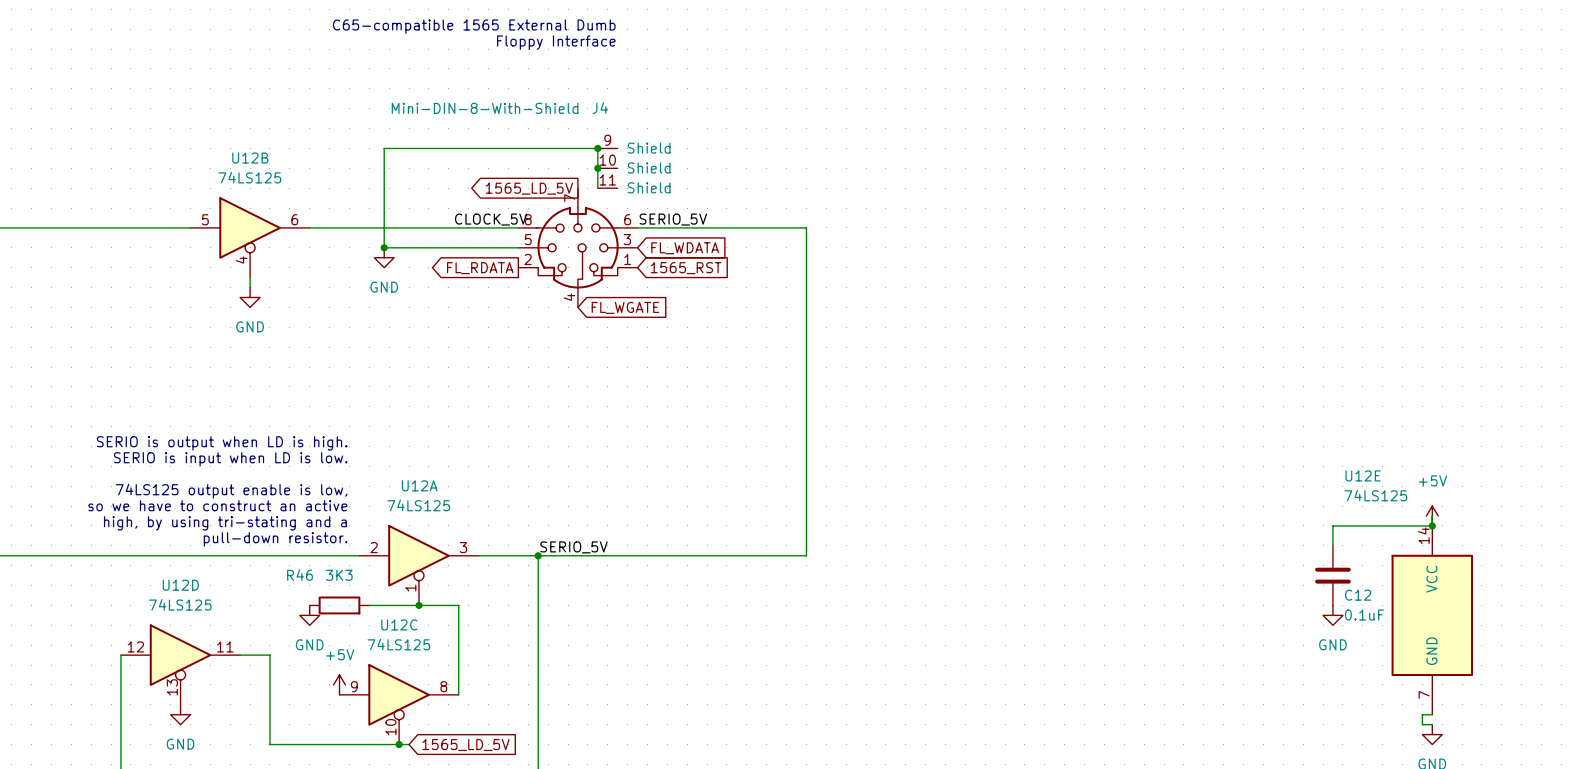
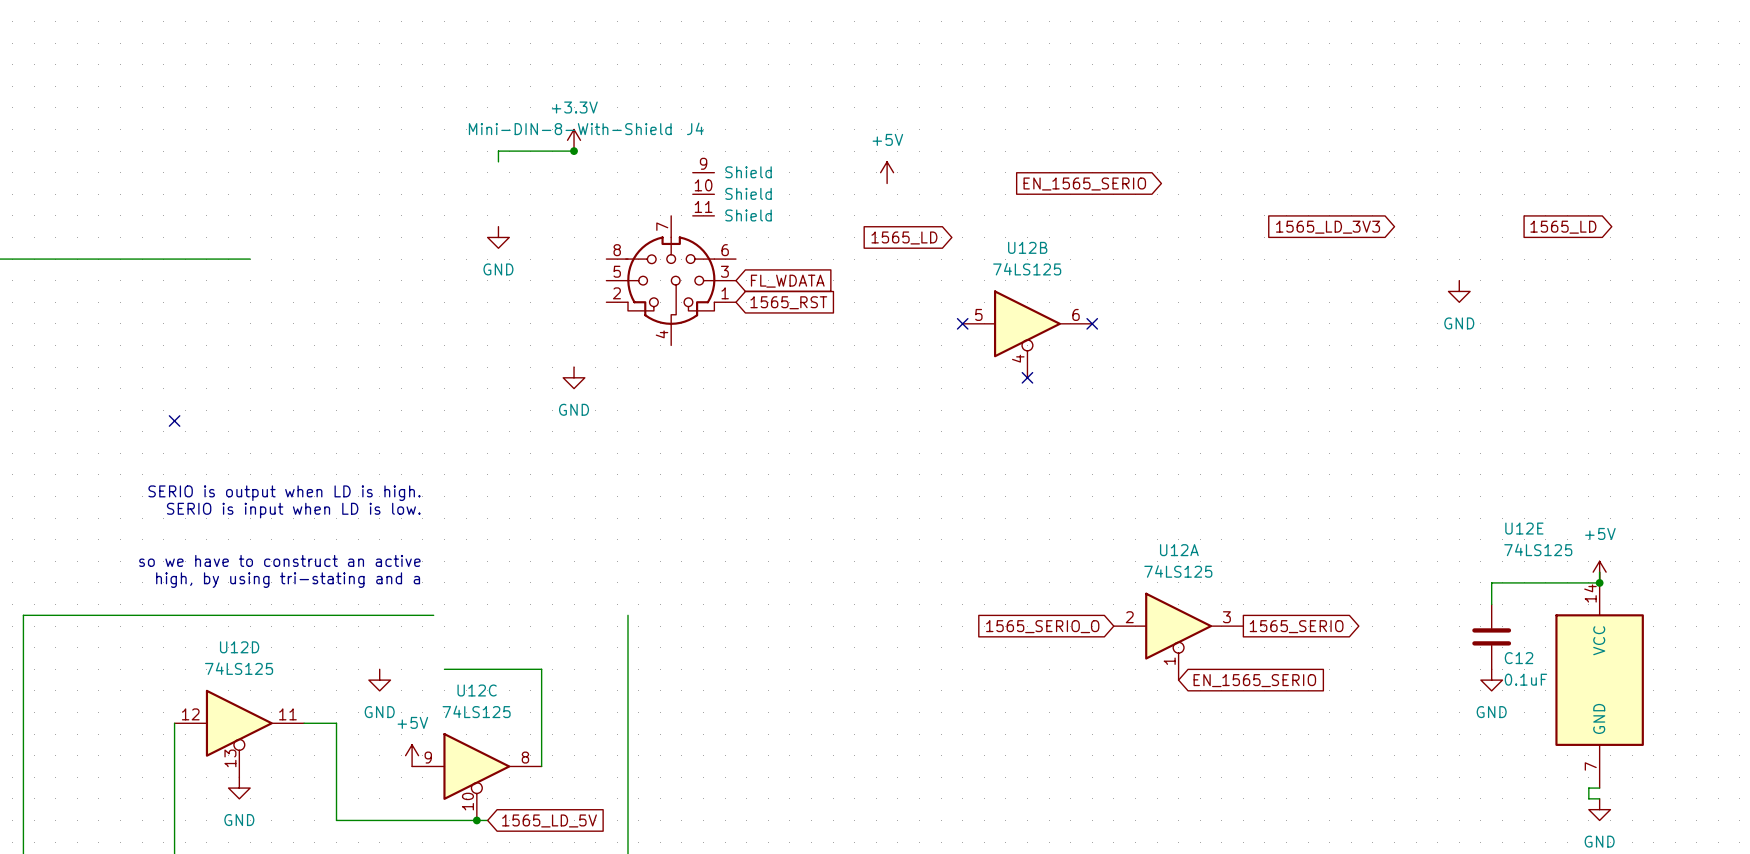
text: C65-compatible 1565 External Dumb (474, 26) -> none
text: Floppy Interface (556, 42) -> none
power symbol: none -> +3.3V (574, 140)
wire: none -> (574, 151) (498, 151) (498, 161)
junction: none -> (574, 151)
junction: (597, 148) -> none
power symbol: none -> +5V (887, 172)
global label: none -> EN_1565_SERIO (1084, 184)
junction: (597, 168) -> none
global label: 1565_LD_5V (529, 188) -> none
wire: (597, 188) (597, 148) (384, 148) (384, 247) (518, 247) -> none
global label: none -> 1565_LD_3V3 (1328, 227)
global label: none -> 1565_LD (1563, 227)
global label: none -> 1565_LD (904, 237)
label: CLOCK_5V (491, 219) -> none
label: SERIO_5V (673, 219) -> none
wire: (309, 227) (518, 227) -> none
wire: (637, 227) (806, 227) (806, 555) (478, 555) -> none
U12B position: (250, 237) -> (1027, 334)
junction: (384, 247) -> none
power symbol position: GND (384, 257) -> GND (498, 237)
power symbol: none -> GND (1459, 291)
global label: FL_RDATA (480, 268) -> none
wire: (250, 277) (250, 287) -> none
no-connect mark: none -> (962, 323)
no-connect mark: none -> (1092, 323)
power symbol: GND (250, 297) -> none
global label: FL_WGATE (625, 307) -> none
power symbol: none -> GND (574, 377)
no-connect mark: none -> (1027, 377)
no-connect mark: none -> (174, 421)
text: 74LS125 output enable is low, (231, 491) -> none
text: pull-down resistor. (275, 539) -> none
label: SERIO_5V (573, 547) -> none
junction: (538, 555) -> none
U12A position: (418, 565) -> (1178, 636)
global label: none -> 1565_SERIO_O (1042, 626)
global label: none -> 1565_SERIO (1296, 626)
R46: 3K3 (339, 605) -> none
junction: (418, 605) -> none
global label: none -> EN_1565_SERIO (1254, 680)

